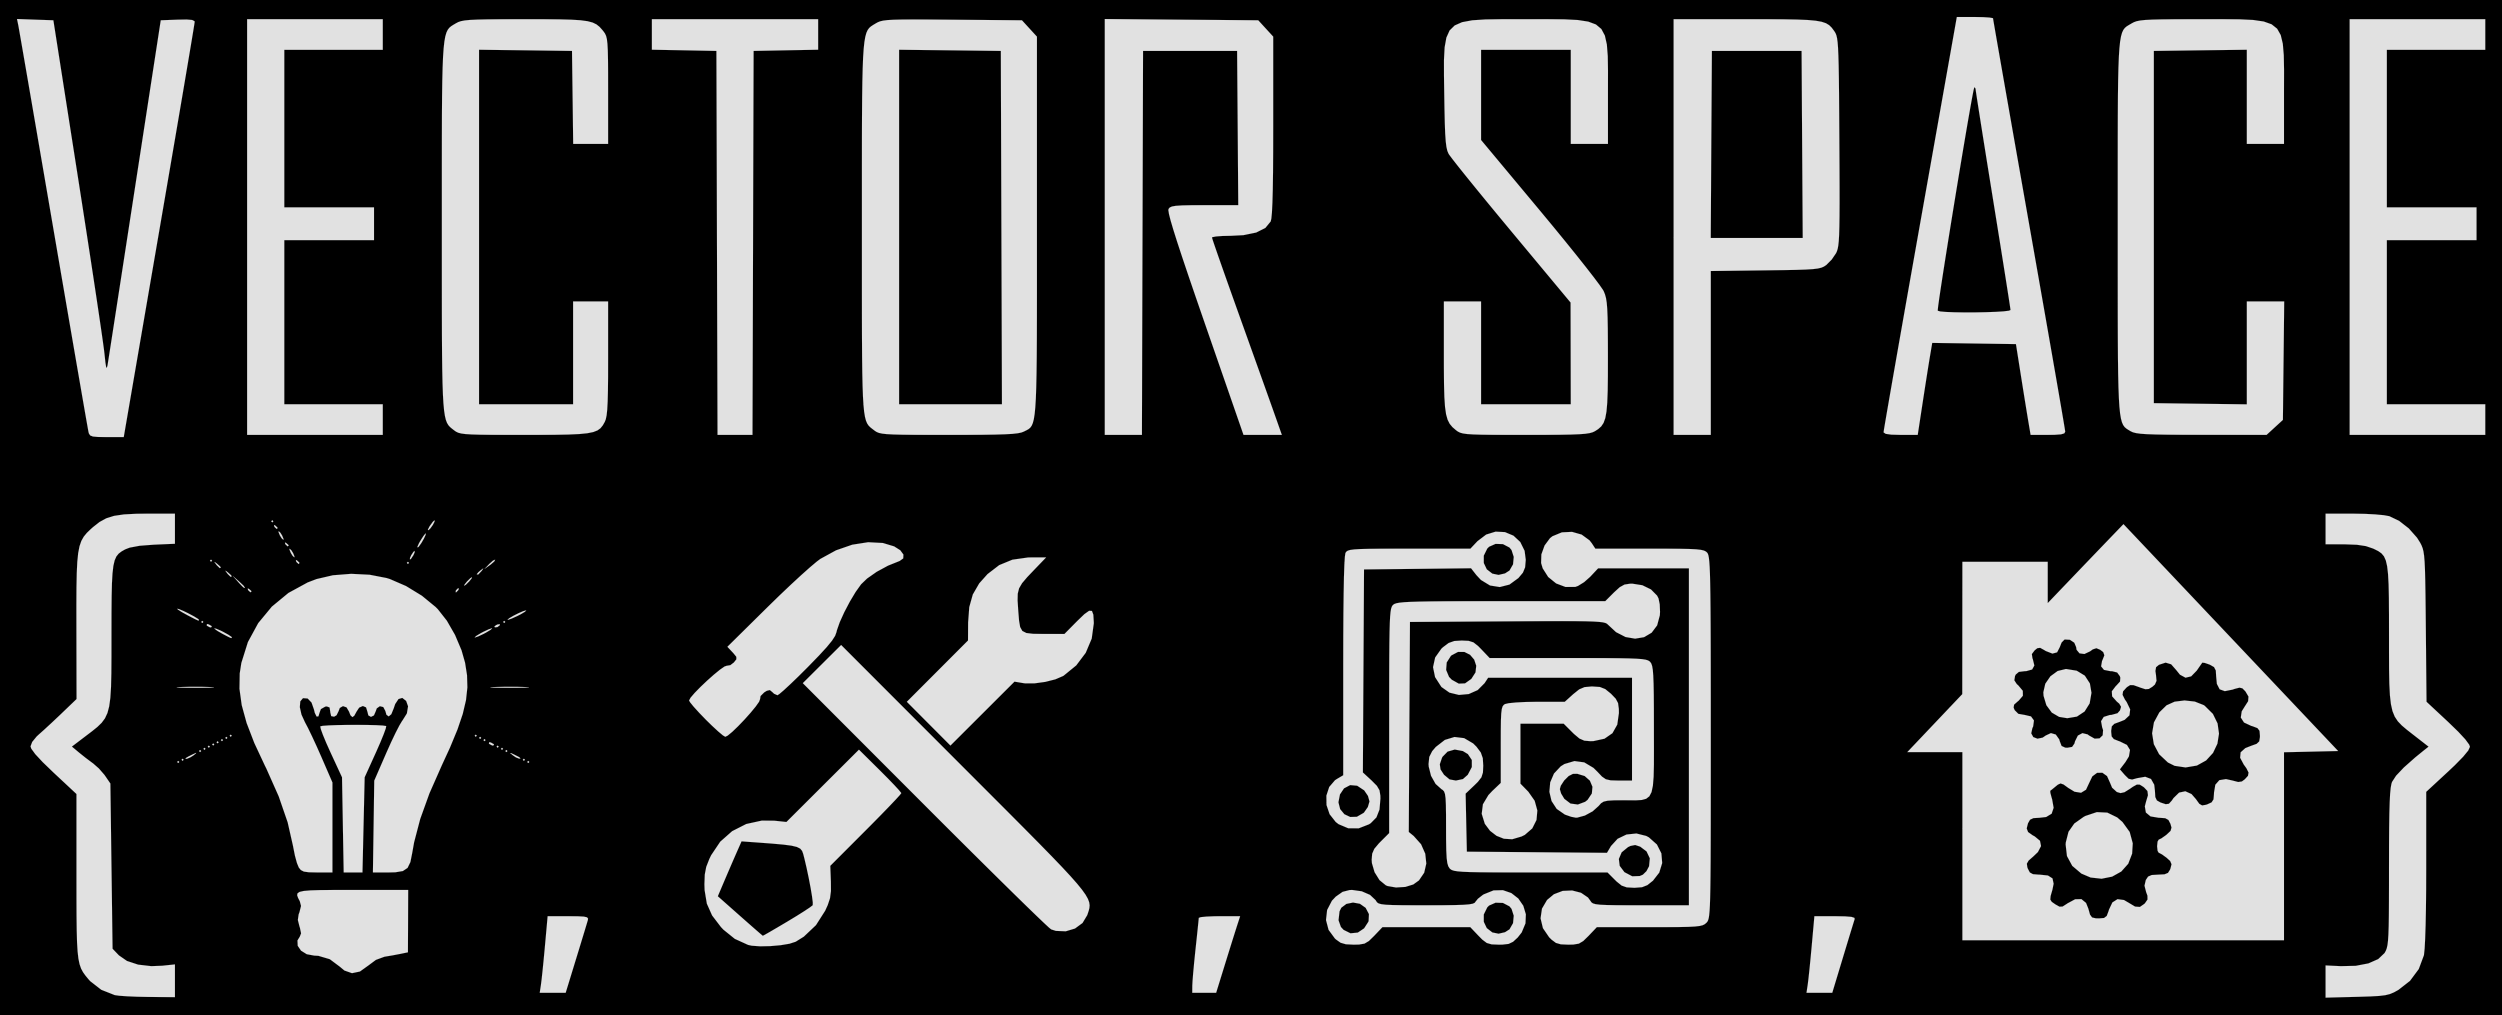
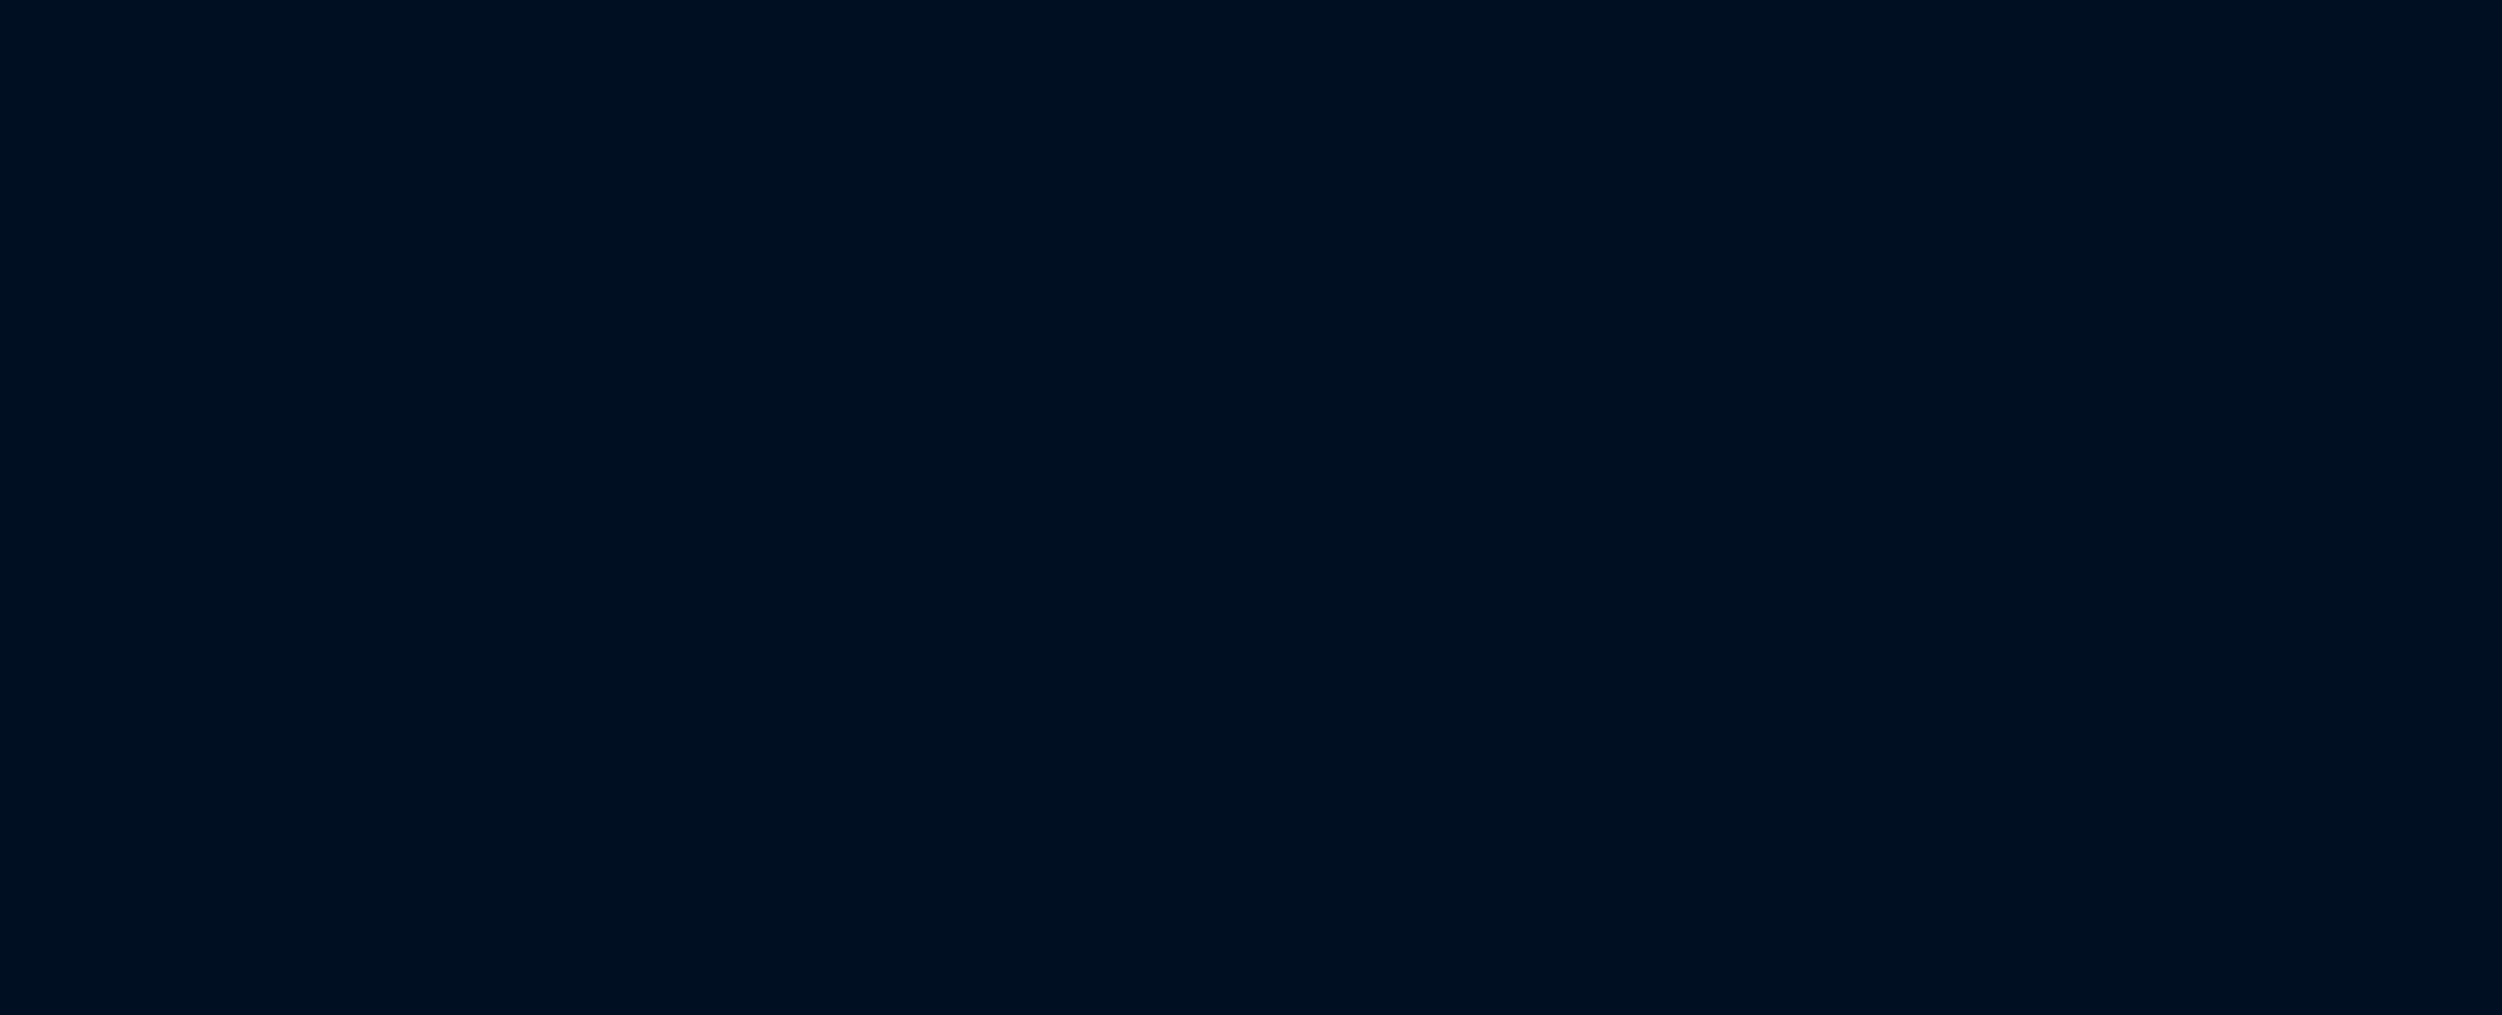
drawing: [16, 16, 2486, 998] -> none

